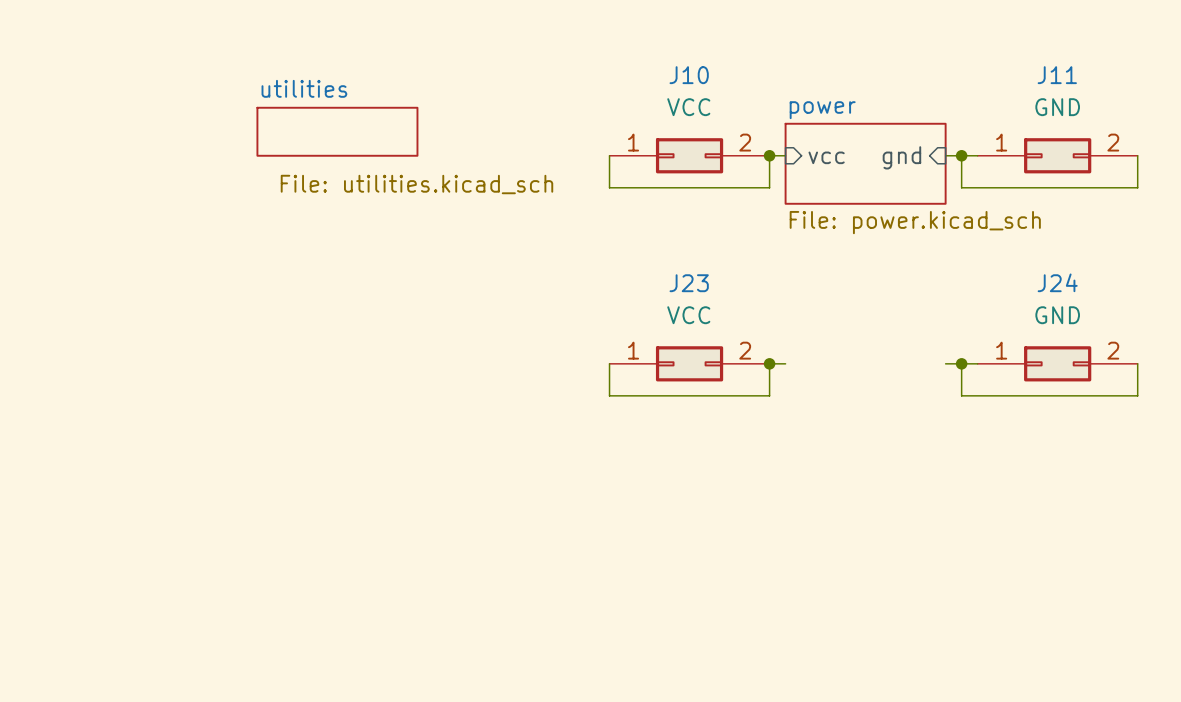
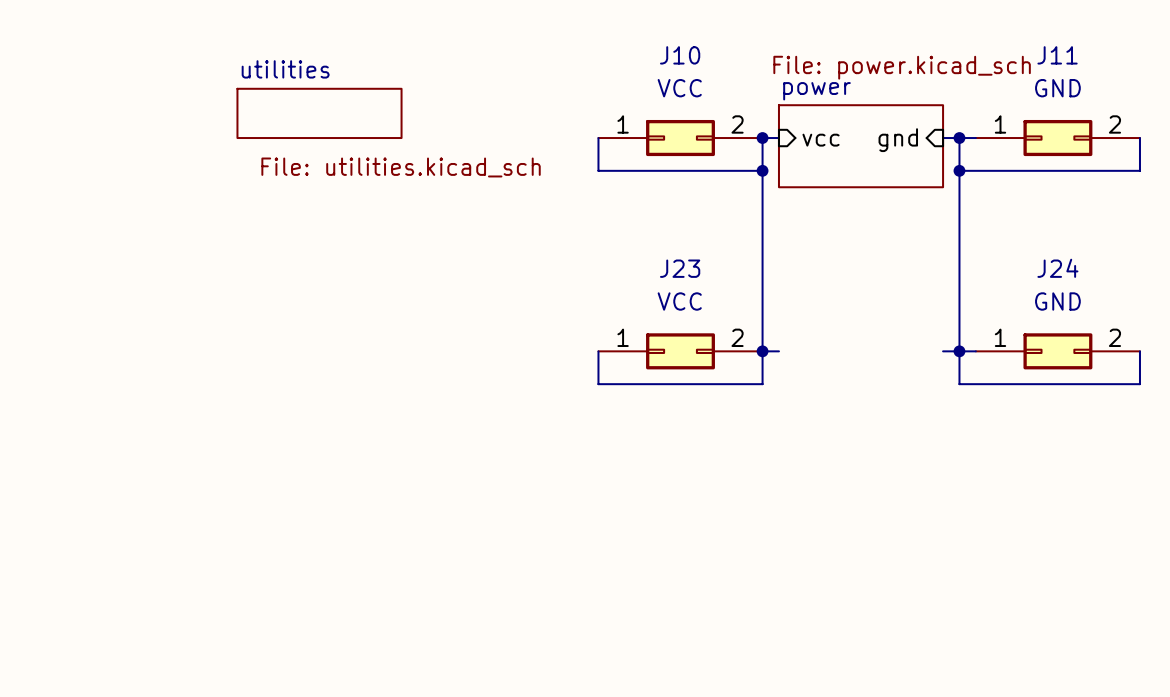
wire: none -> (762, 170) (762, 351)
junction: none -> (762, 170)
wire: none -> (959, 170) (959, 351)
junction: none -> (959, 170)
sheet power value position: File: power.kicad_sch (915, 222) -> File: power.kicad_sch (902, 67)

